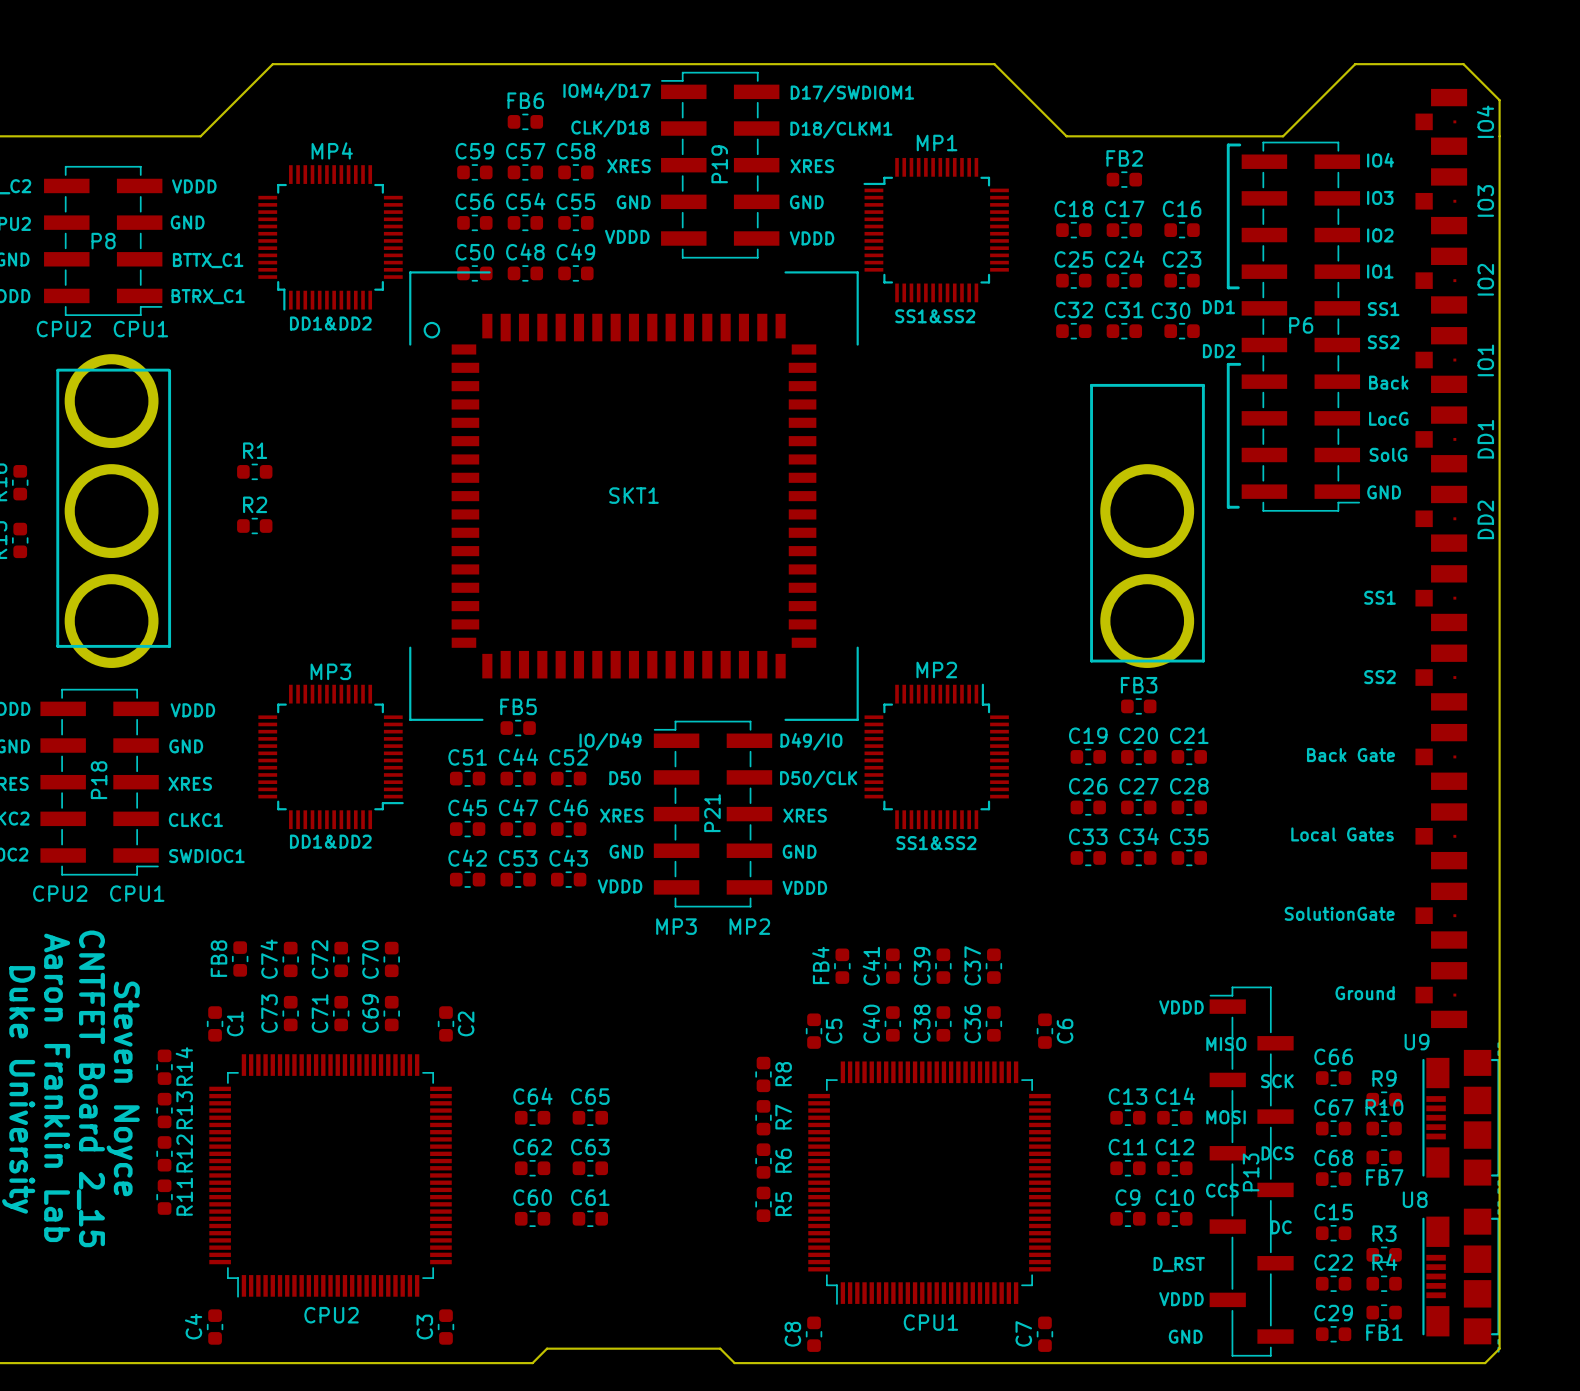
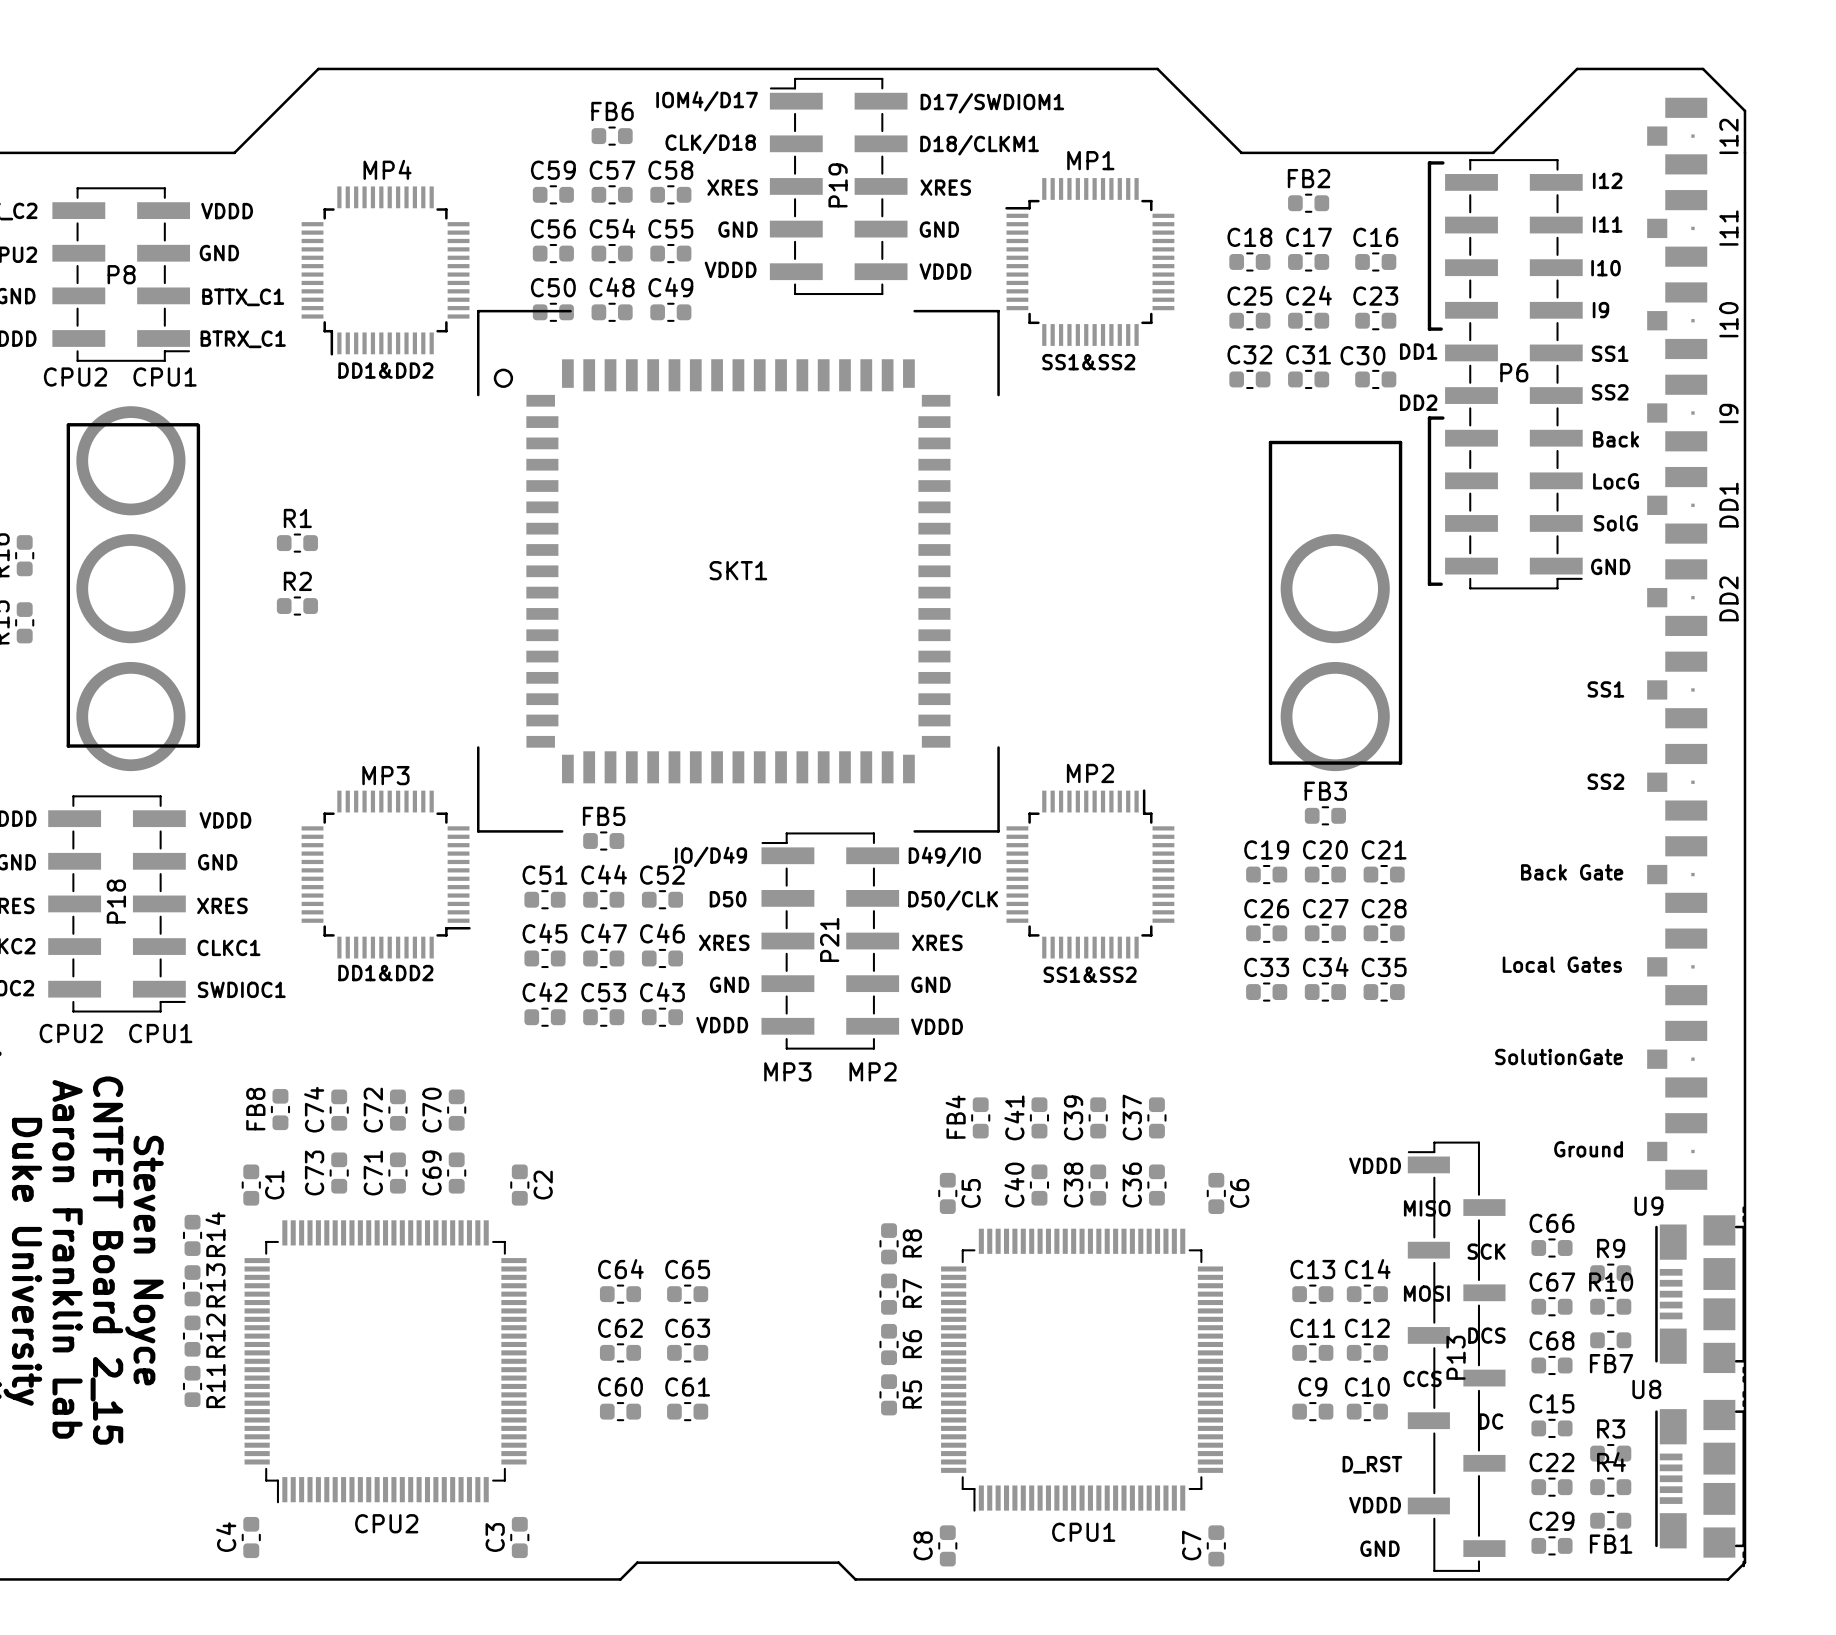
text: IO4 (1485, 121) -> I12 (1728, 136)
text: IO4 (1380, 160) -> I12 (1607, 180)
text: IO3 (1380, 197) -> I11 (1607, 224)
text: IO3 (1485, 200) -> I11 (1728, 228)
text: IO2 (1380, 235) -> I10 (1606, 268)
text: IO1 (1380, 271) -> I9 (1600, 310)
text: IO2 (1485, 279) -> I10 (1728, 319)
text: IO1 (1485, 360) -> I9 (1728, 413)

